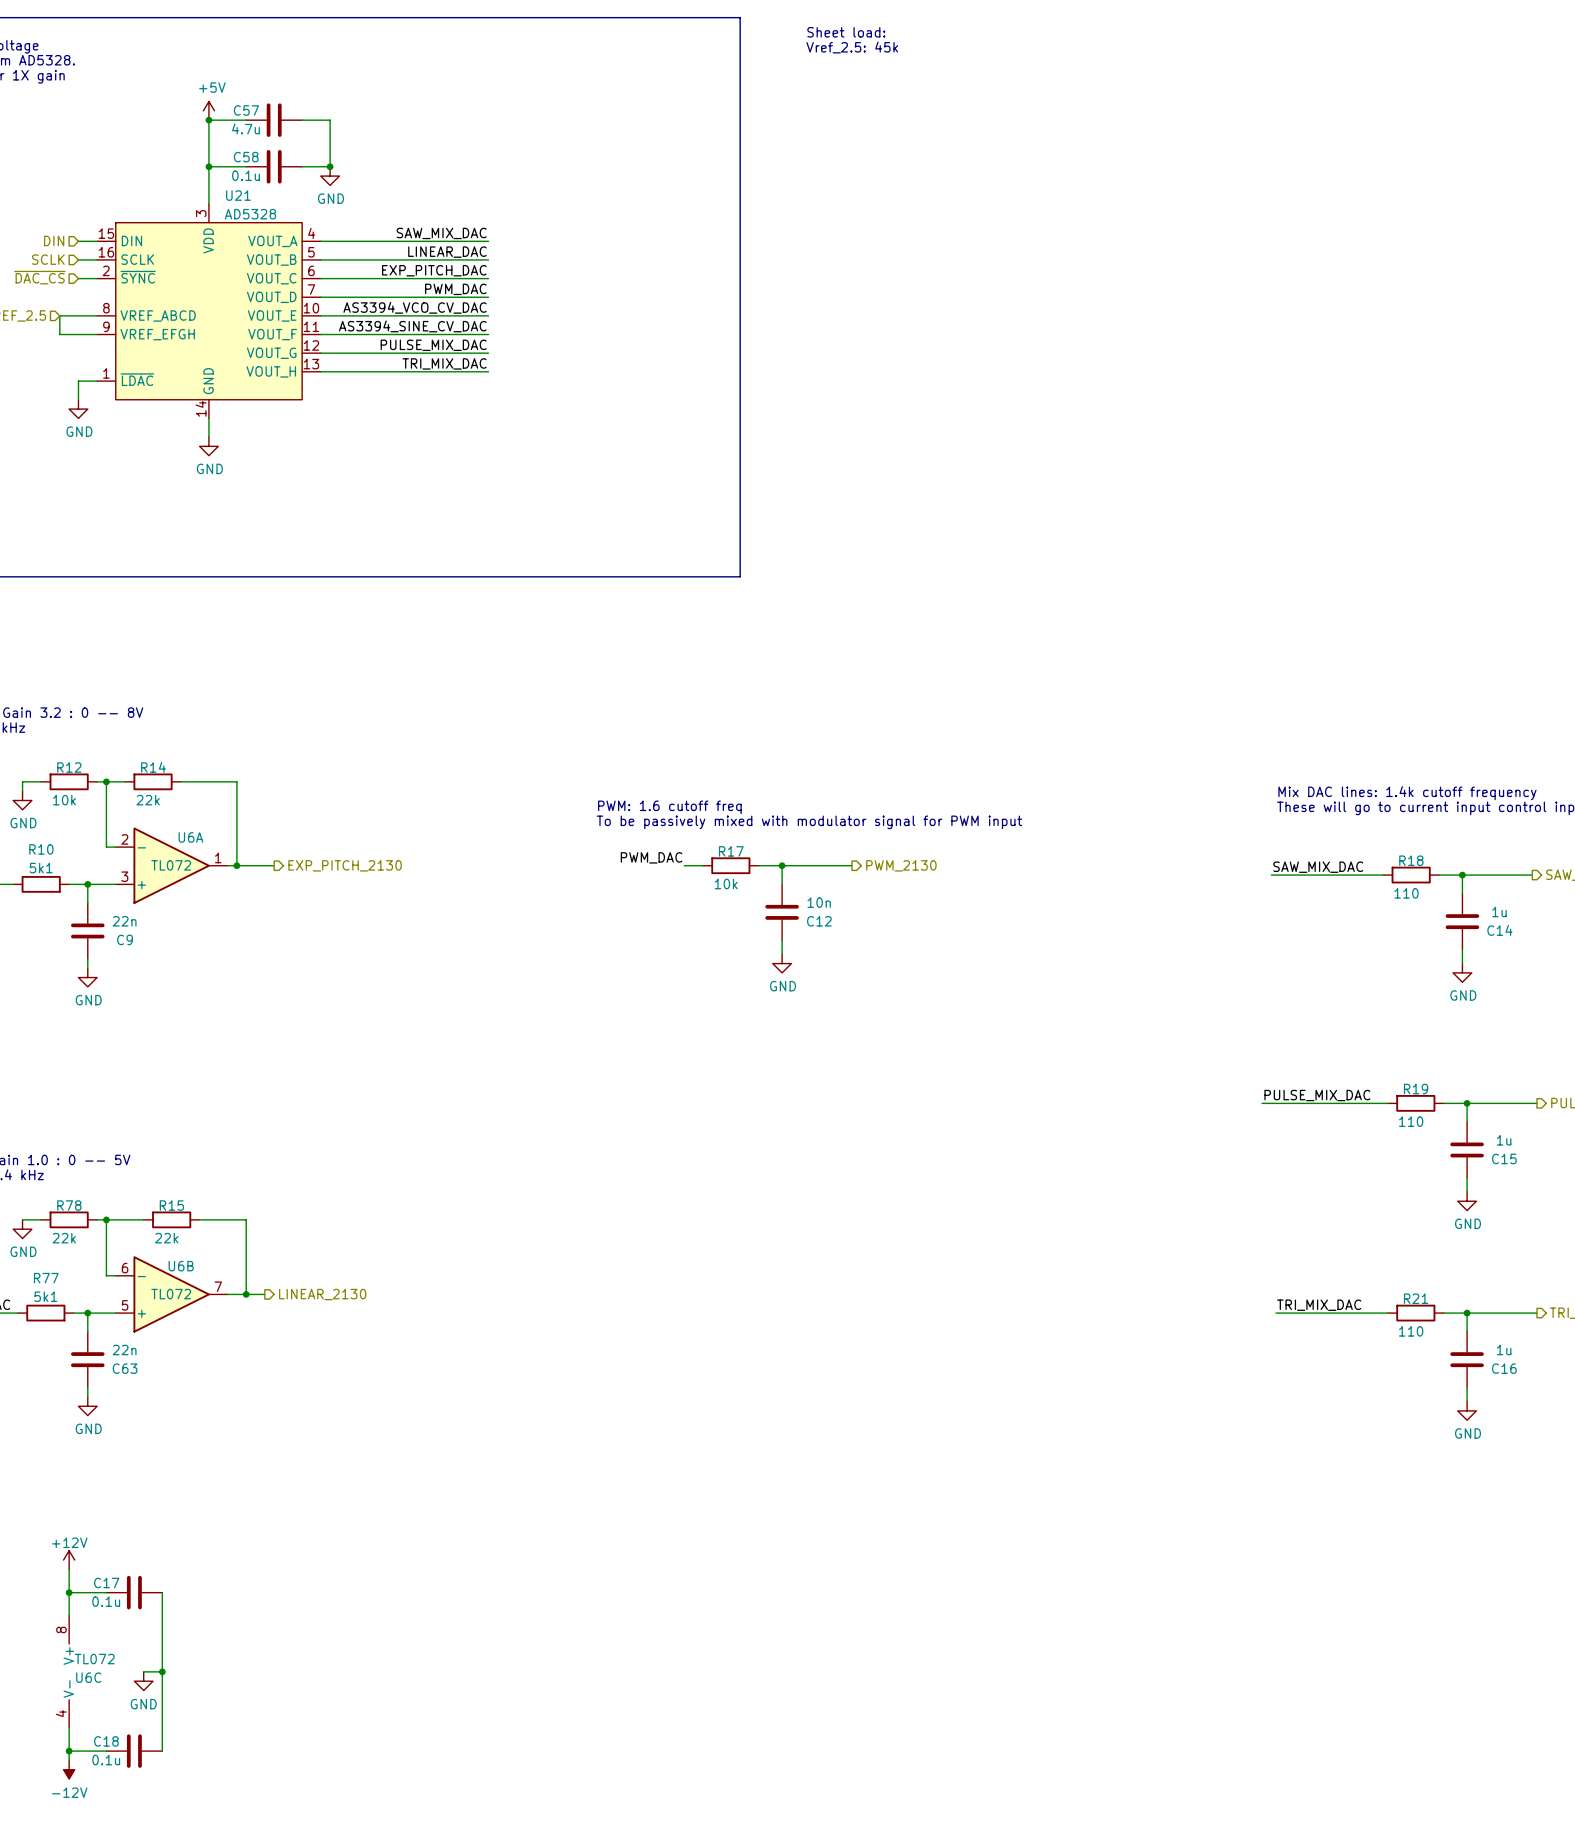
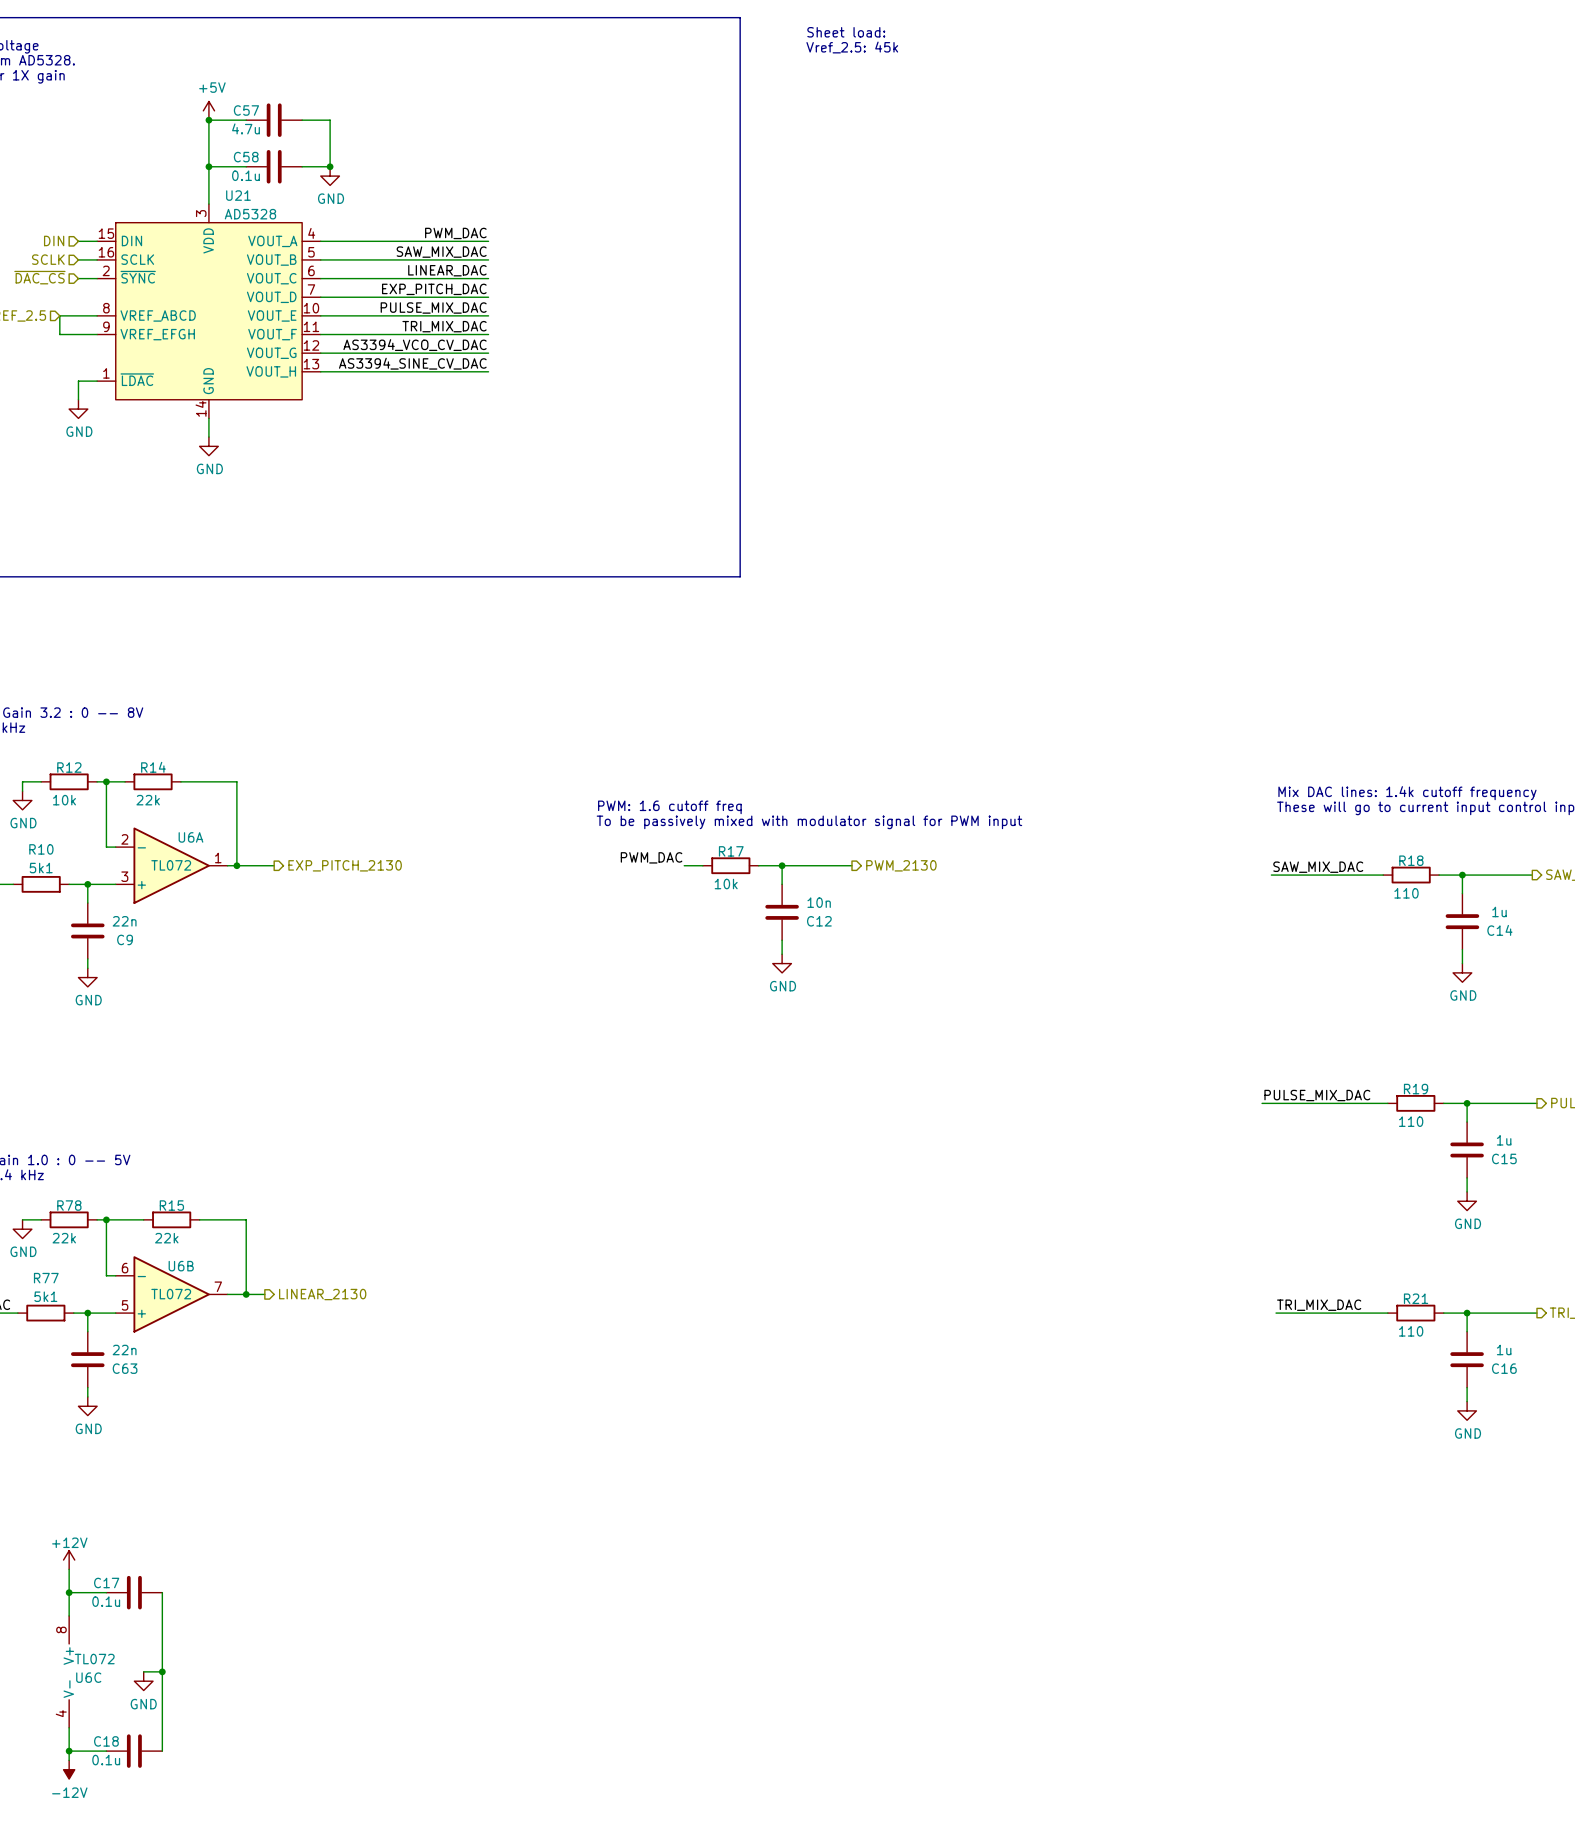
label: SAW_MIX_DAC (441, 233) -> PWM_DAC (455, 233)
label: LINEAR_DAC (447, 252) -> SAW_MIX_DAC (441, 252)
label: EXP_PITCH_DAC (434, 270) -> LINEAR_DAC (447, 270)
label: PWM_DAC (455, 289) -> EXP_PITCH_DAC (434, 289)
label: AS3394_VCO_CV_DAC (415, 307) -> PULSE_MIX_DAC (433, 308)
label: AS3394_SINE_CV_DAC (412, 326) -> TRI_MIX_DAC (444, 326)
label: PULSE_MIX_DAC (433, 345) -> AS3394_VCO_CV_DAC (415, 345)
label: TRI_MIX_DAC (444, 363) -> AS3394_SINE_CV_DAC (412, 363)

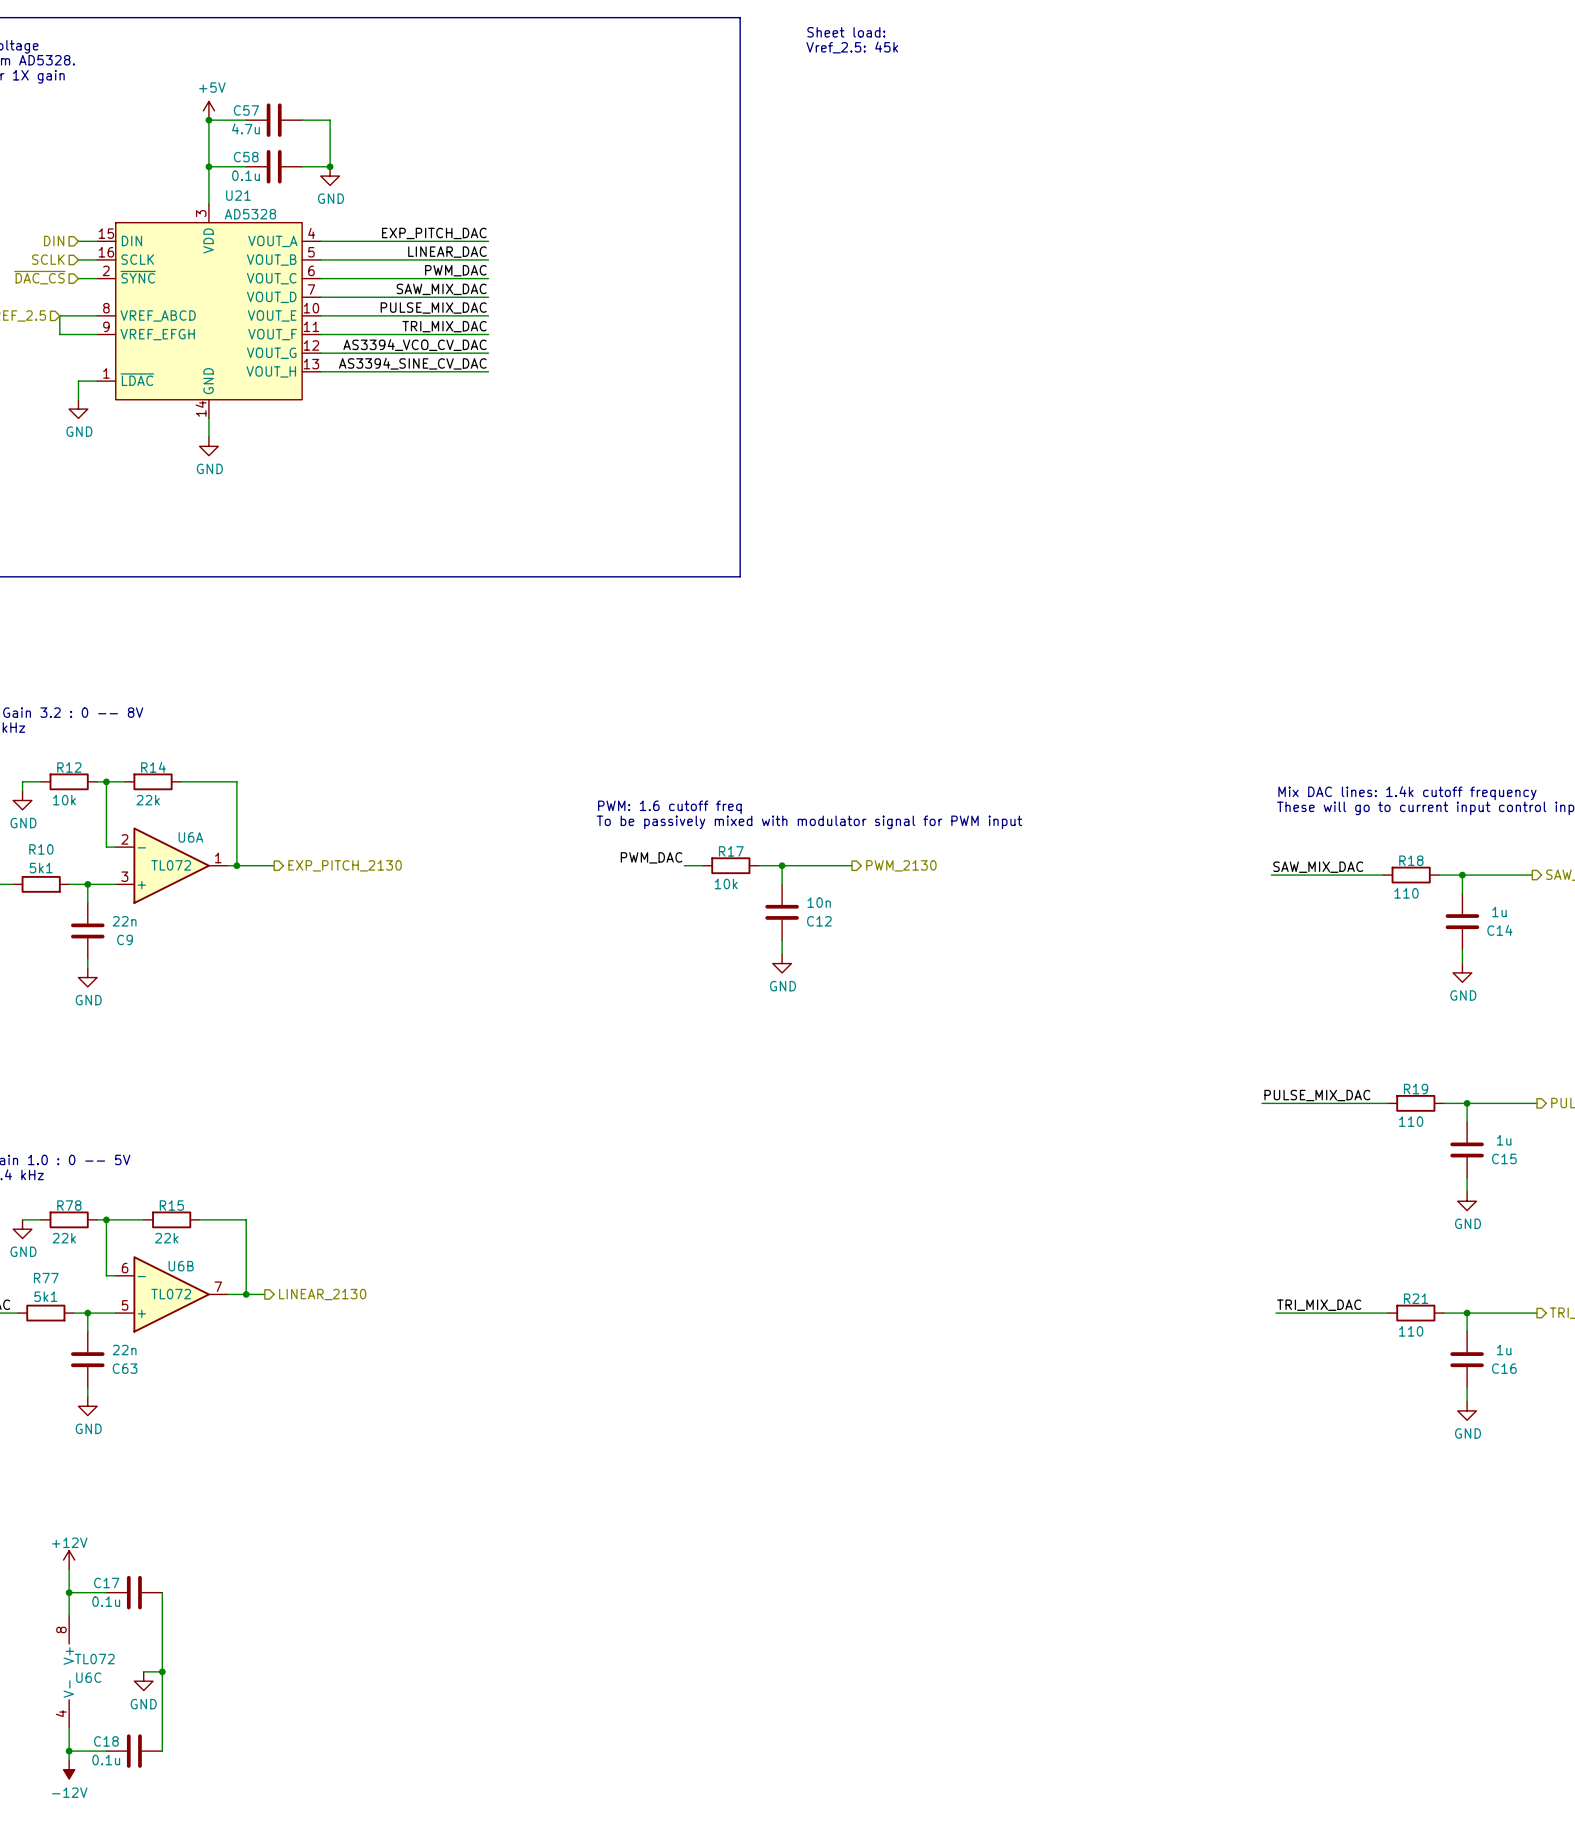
label: PWM_DAC (455, 233) -> EXP_PITCH_DAC (434, 233)
label: SAW_MIX_DAC (441, 252) -> LINEAR_DAC (447, 252)
label: LINEAR_DAC (447, 270) -> PWM_DAC (455, 270)
label: EXP_PITCH_DAC (434, 289) -> SAW_MIX_DAC (441, 289)

